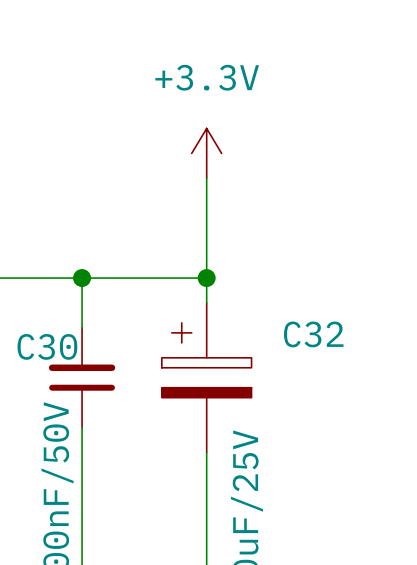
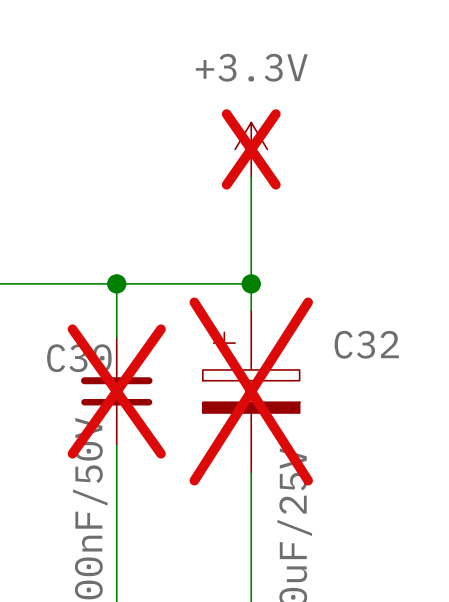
power symbol do-not-place cross: none -> (251, 149)
C30 do-not-place cross: none -> (116, 391)
C32 do-not-place cross: none -> (251, 391)

